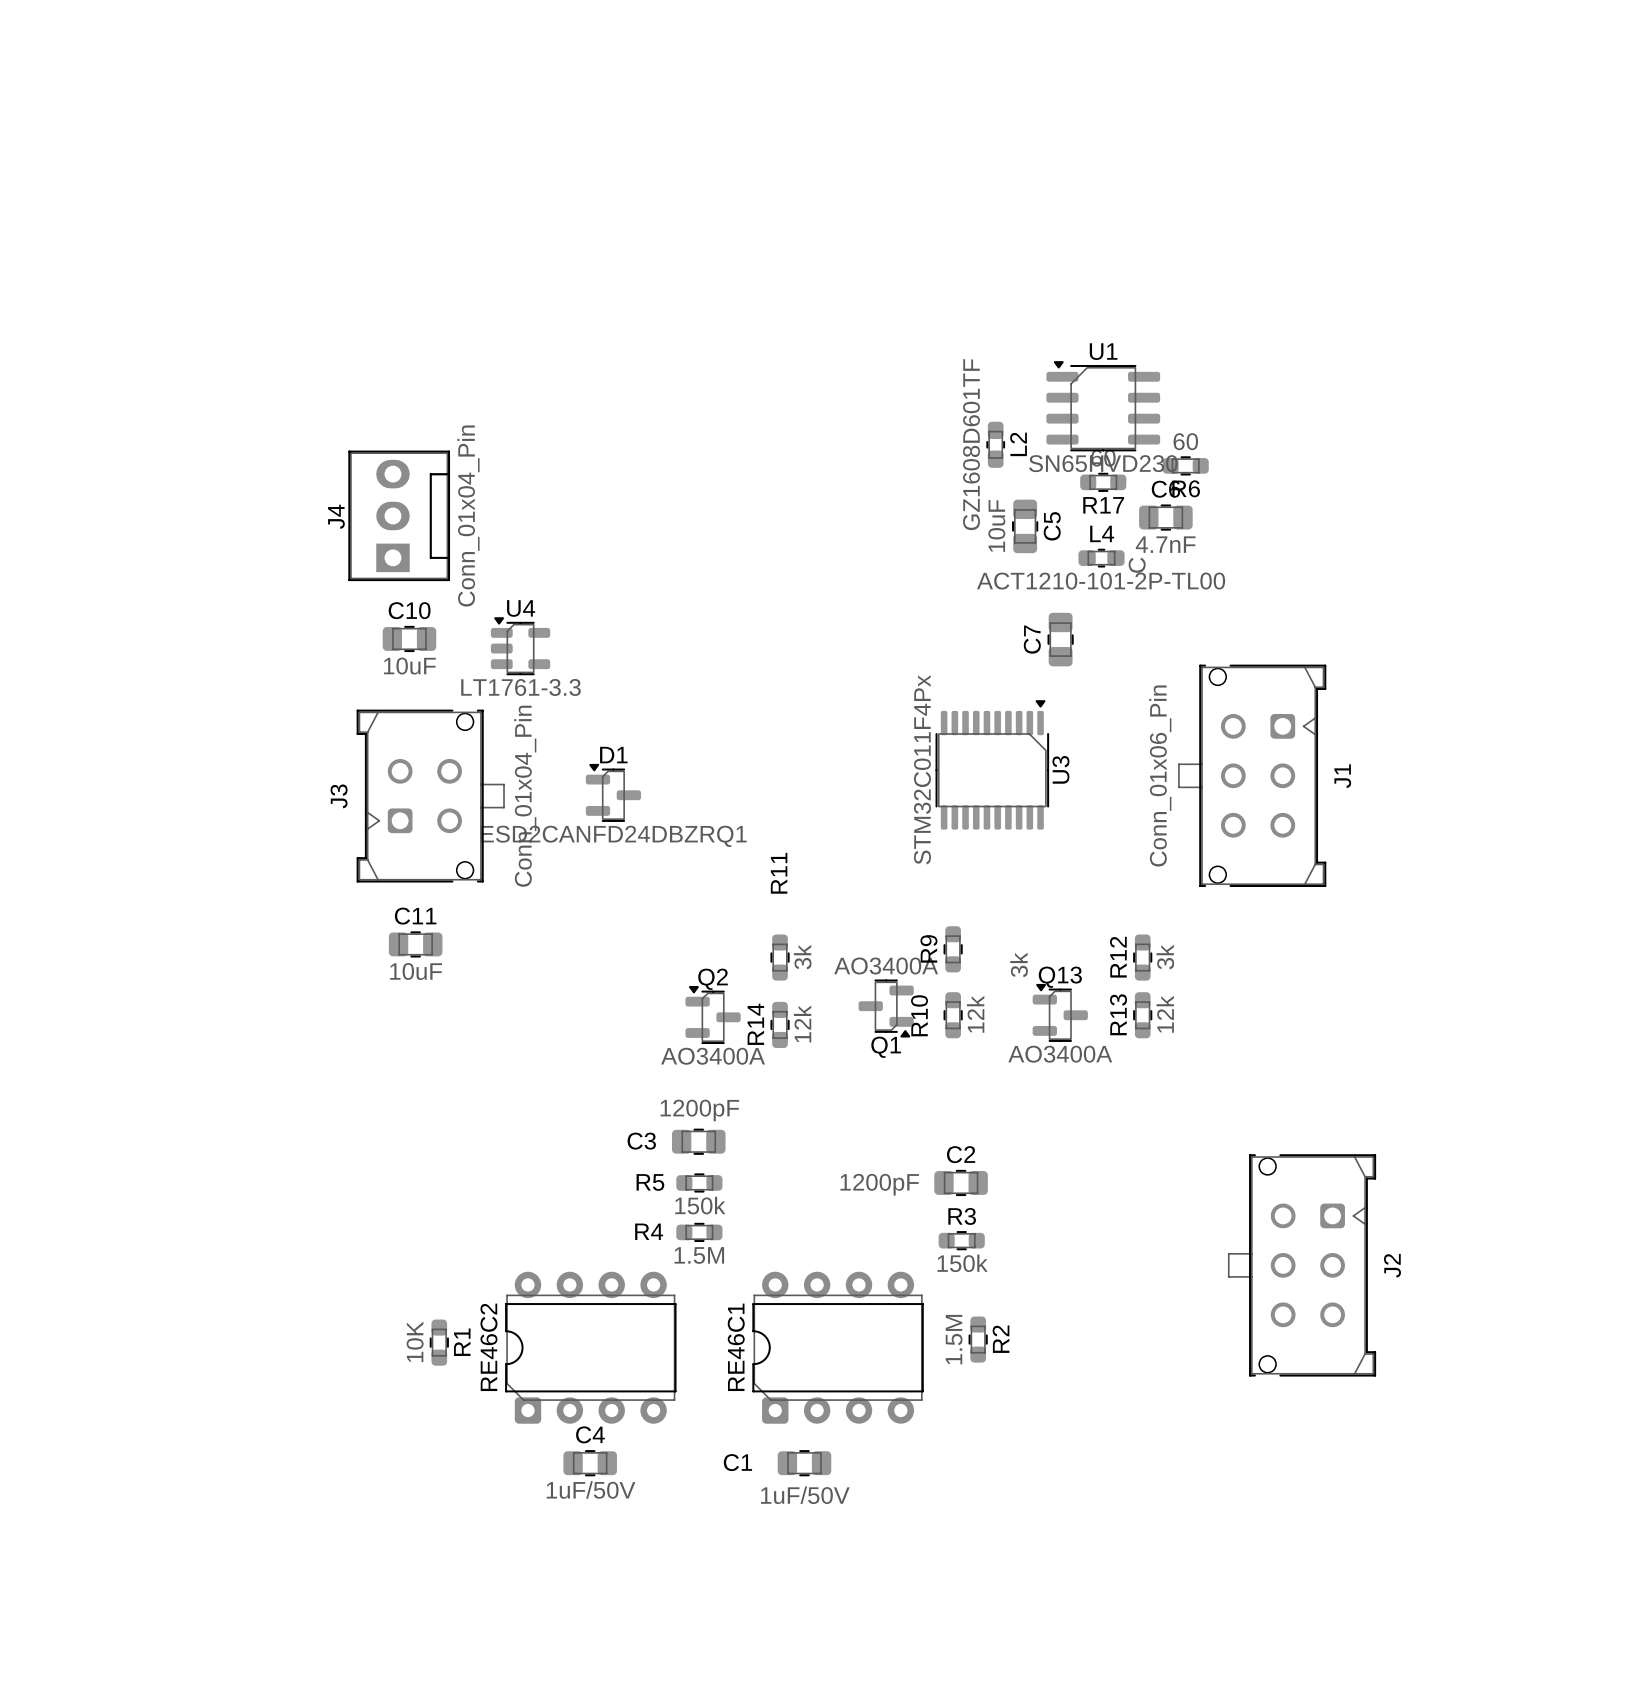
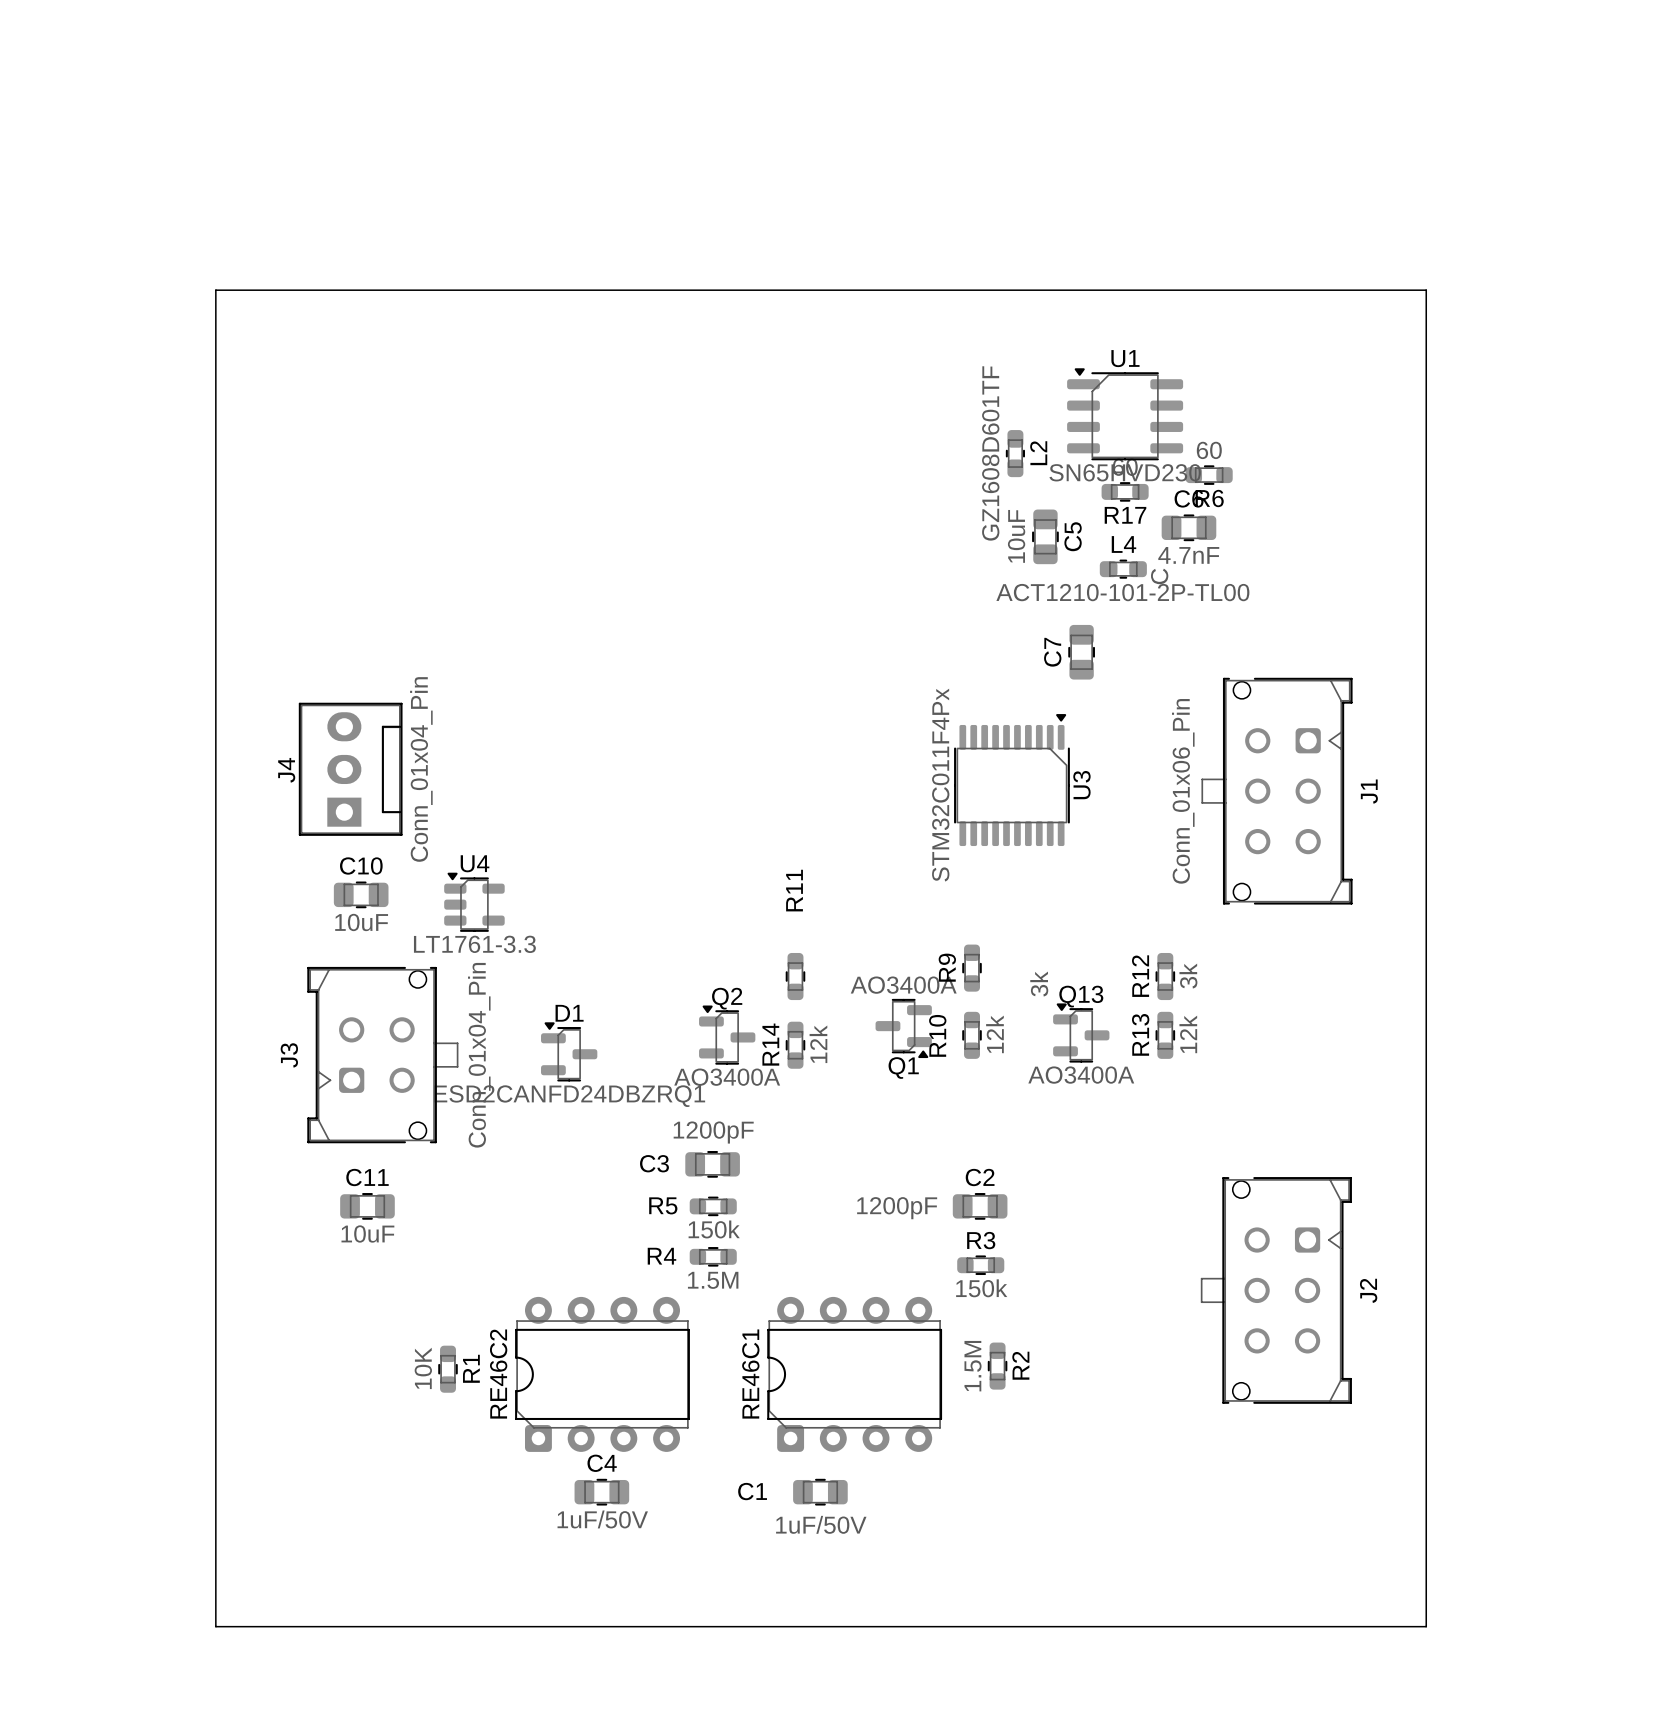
board edge: none -> (215, 290) (1426, 290) (1426, 1626) (215, 1626) (215, 290)
J4 position: (399, 515) -> (350, 769)
C10 position: (409, 638) -> (361, 894)
U4 position: (520, 646) -> (474, 902)
D1 position: (613, 792) -> (569, 1051)
J3 position: (430, 796) -> (382, 1055)
C11 position: (415, 944) -> (367, 1206)
R11 value: 3k (802, 957) -> none
J2 position: (1302, 1265) -> (1276, 1290)

